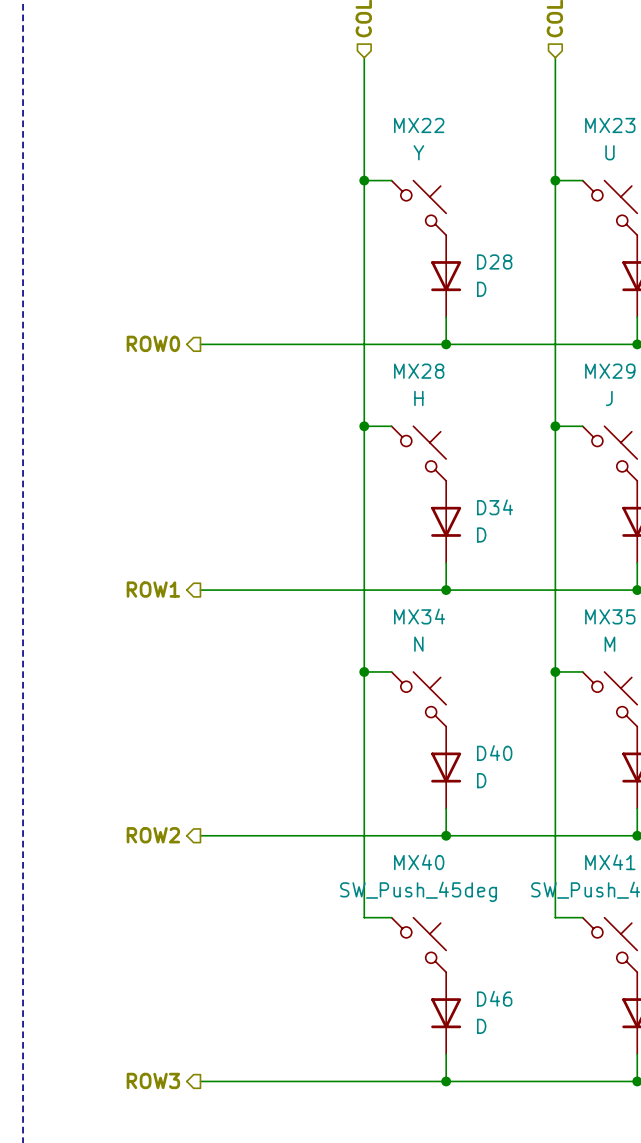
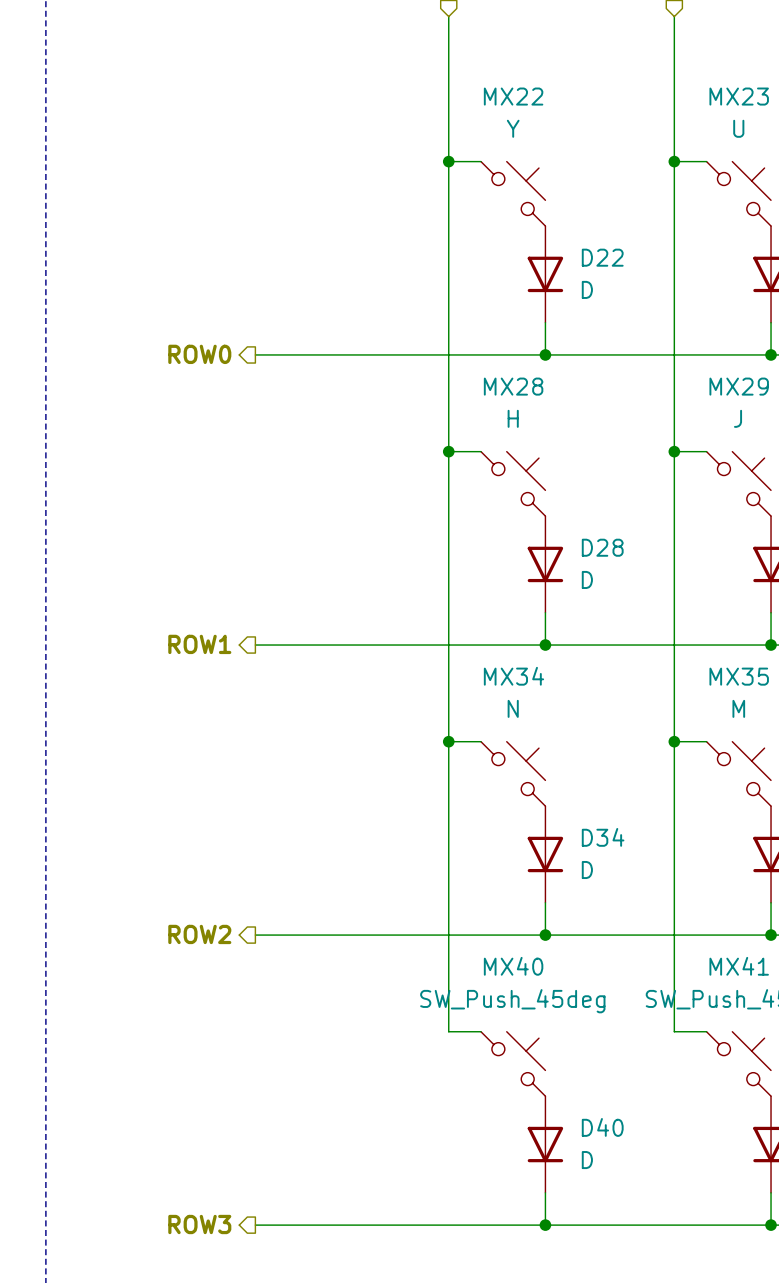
D28 name: D28 (494, 261) -> D22 (602, 257)
D34 name: D34 (495, 507) -> D28 (602, 547)
D40 name: D40 (494, 753) -> D34 (603, 837)
D46 name: D46 (494, 998) -> D40 (602, 1127)

